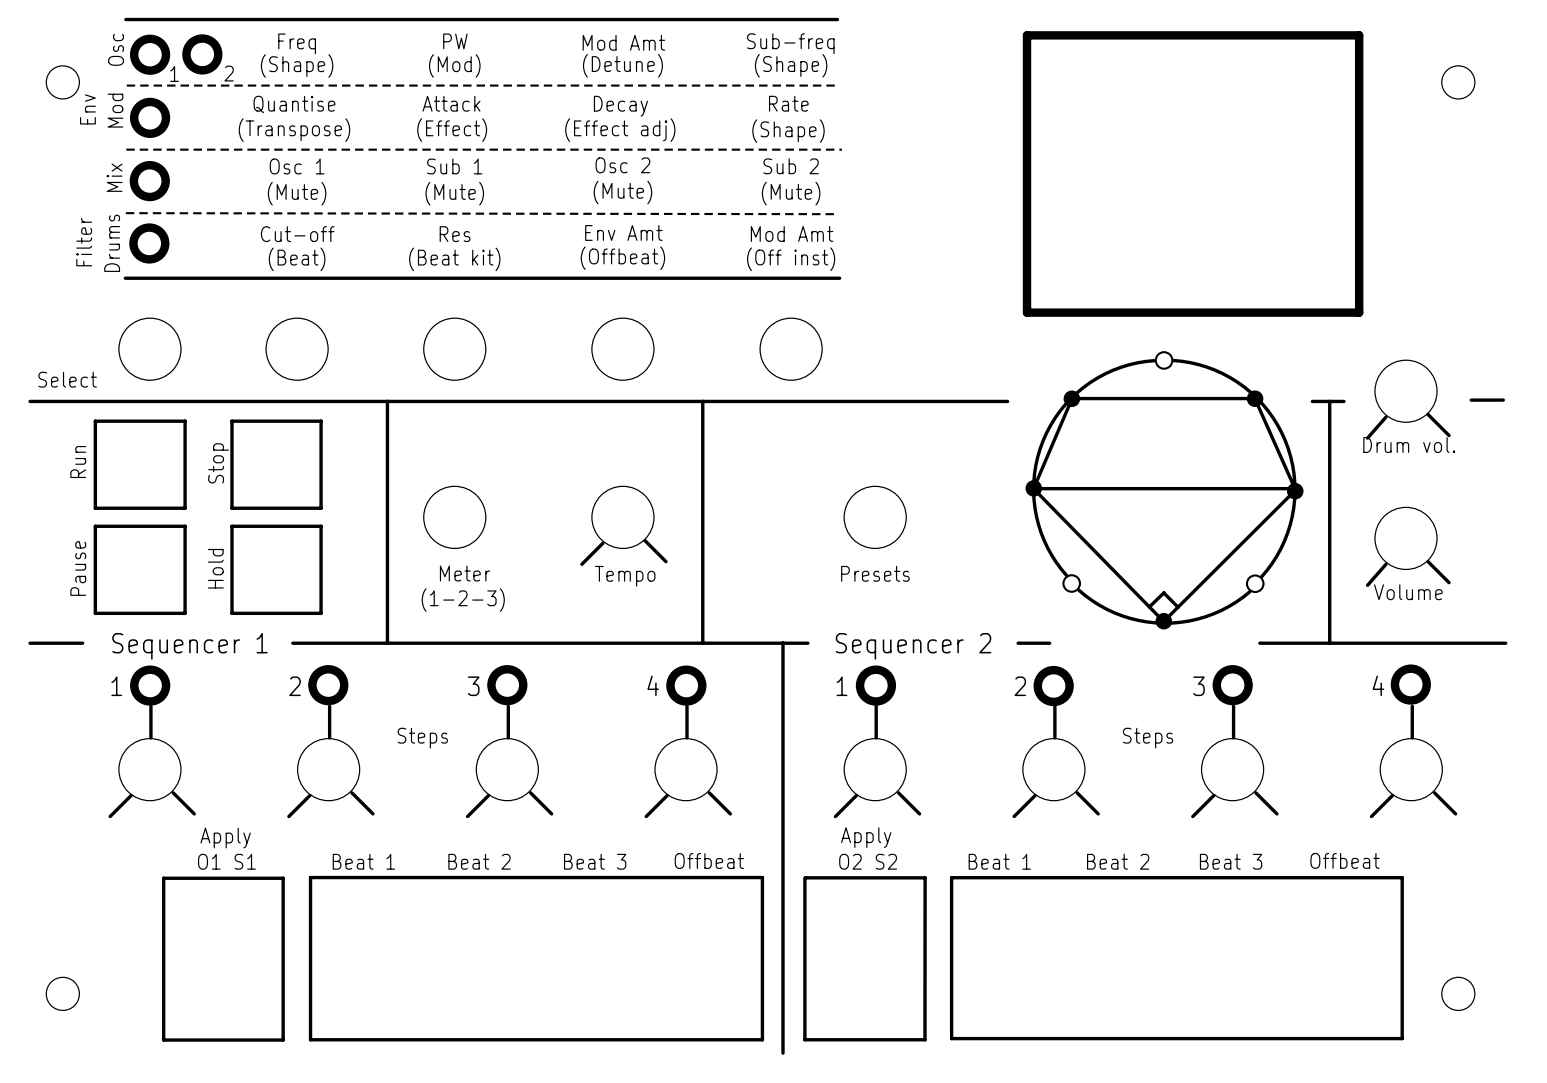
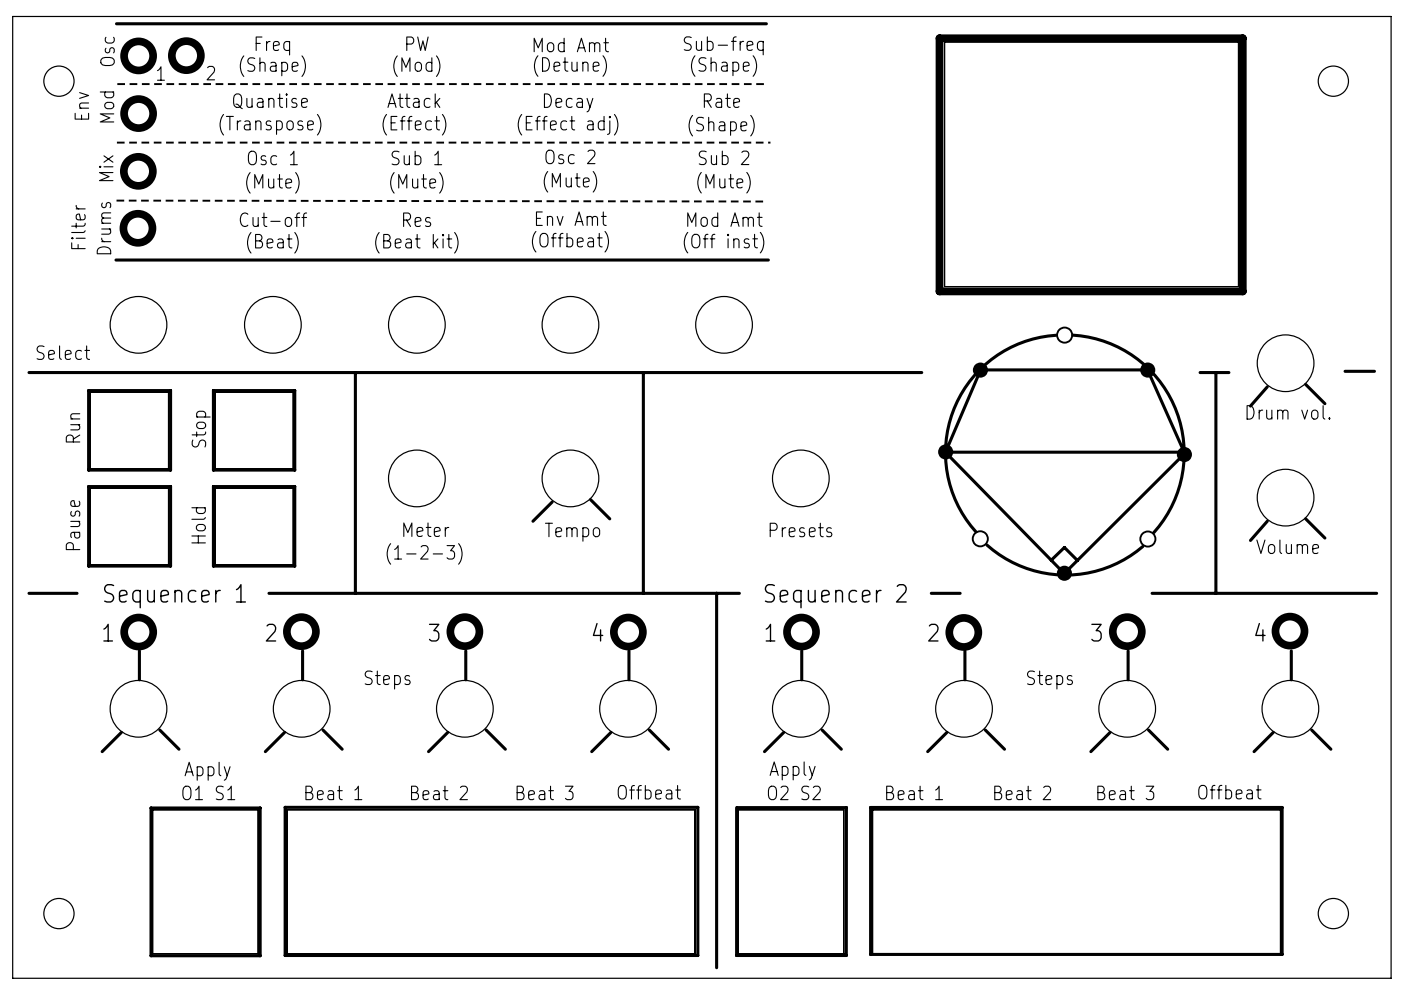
board edge: none -> (12, 16) (1391, 16) (1391, 978) (12, 978) (12, 16)
board edge: none -> (944, 41) (1238, 41) (1238, 286) (944, 286) (944, 41)
board edge: none -> (90, 392) (168, 392) (168, 468) (90, 468) (90, 392)
board edge: none -> (215, 392) (293, 392) (293, 468) (215, 468) (215, 392)
board edge: none -> (90, 488) (90, 564) (168, 564) (168, 488) (90, 488)
board edge: none -> (215, 488) (215, 564) (293, 564) (293, 488) (215, 488)
board edge: none -> (152, 809) (258, 809) (258, 953) (152, 953) (152, 809)
board edge: none -> (286, 809) (694, 809) (694, 953) (286, 953) (286, 809)
board edge: none -> (738, 809) (843, 809) (843, 953) (738, 953) (738, 809)
board edge: none -> (872, 809) (1280, 809) (1280, 953) (872, 953) (872, 809)

